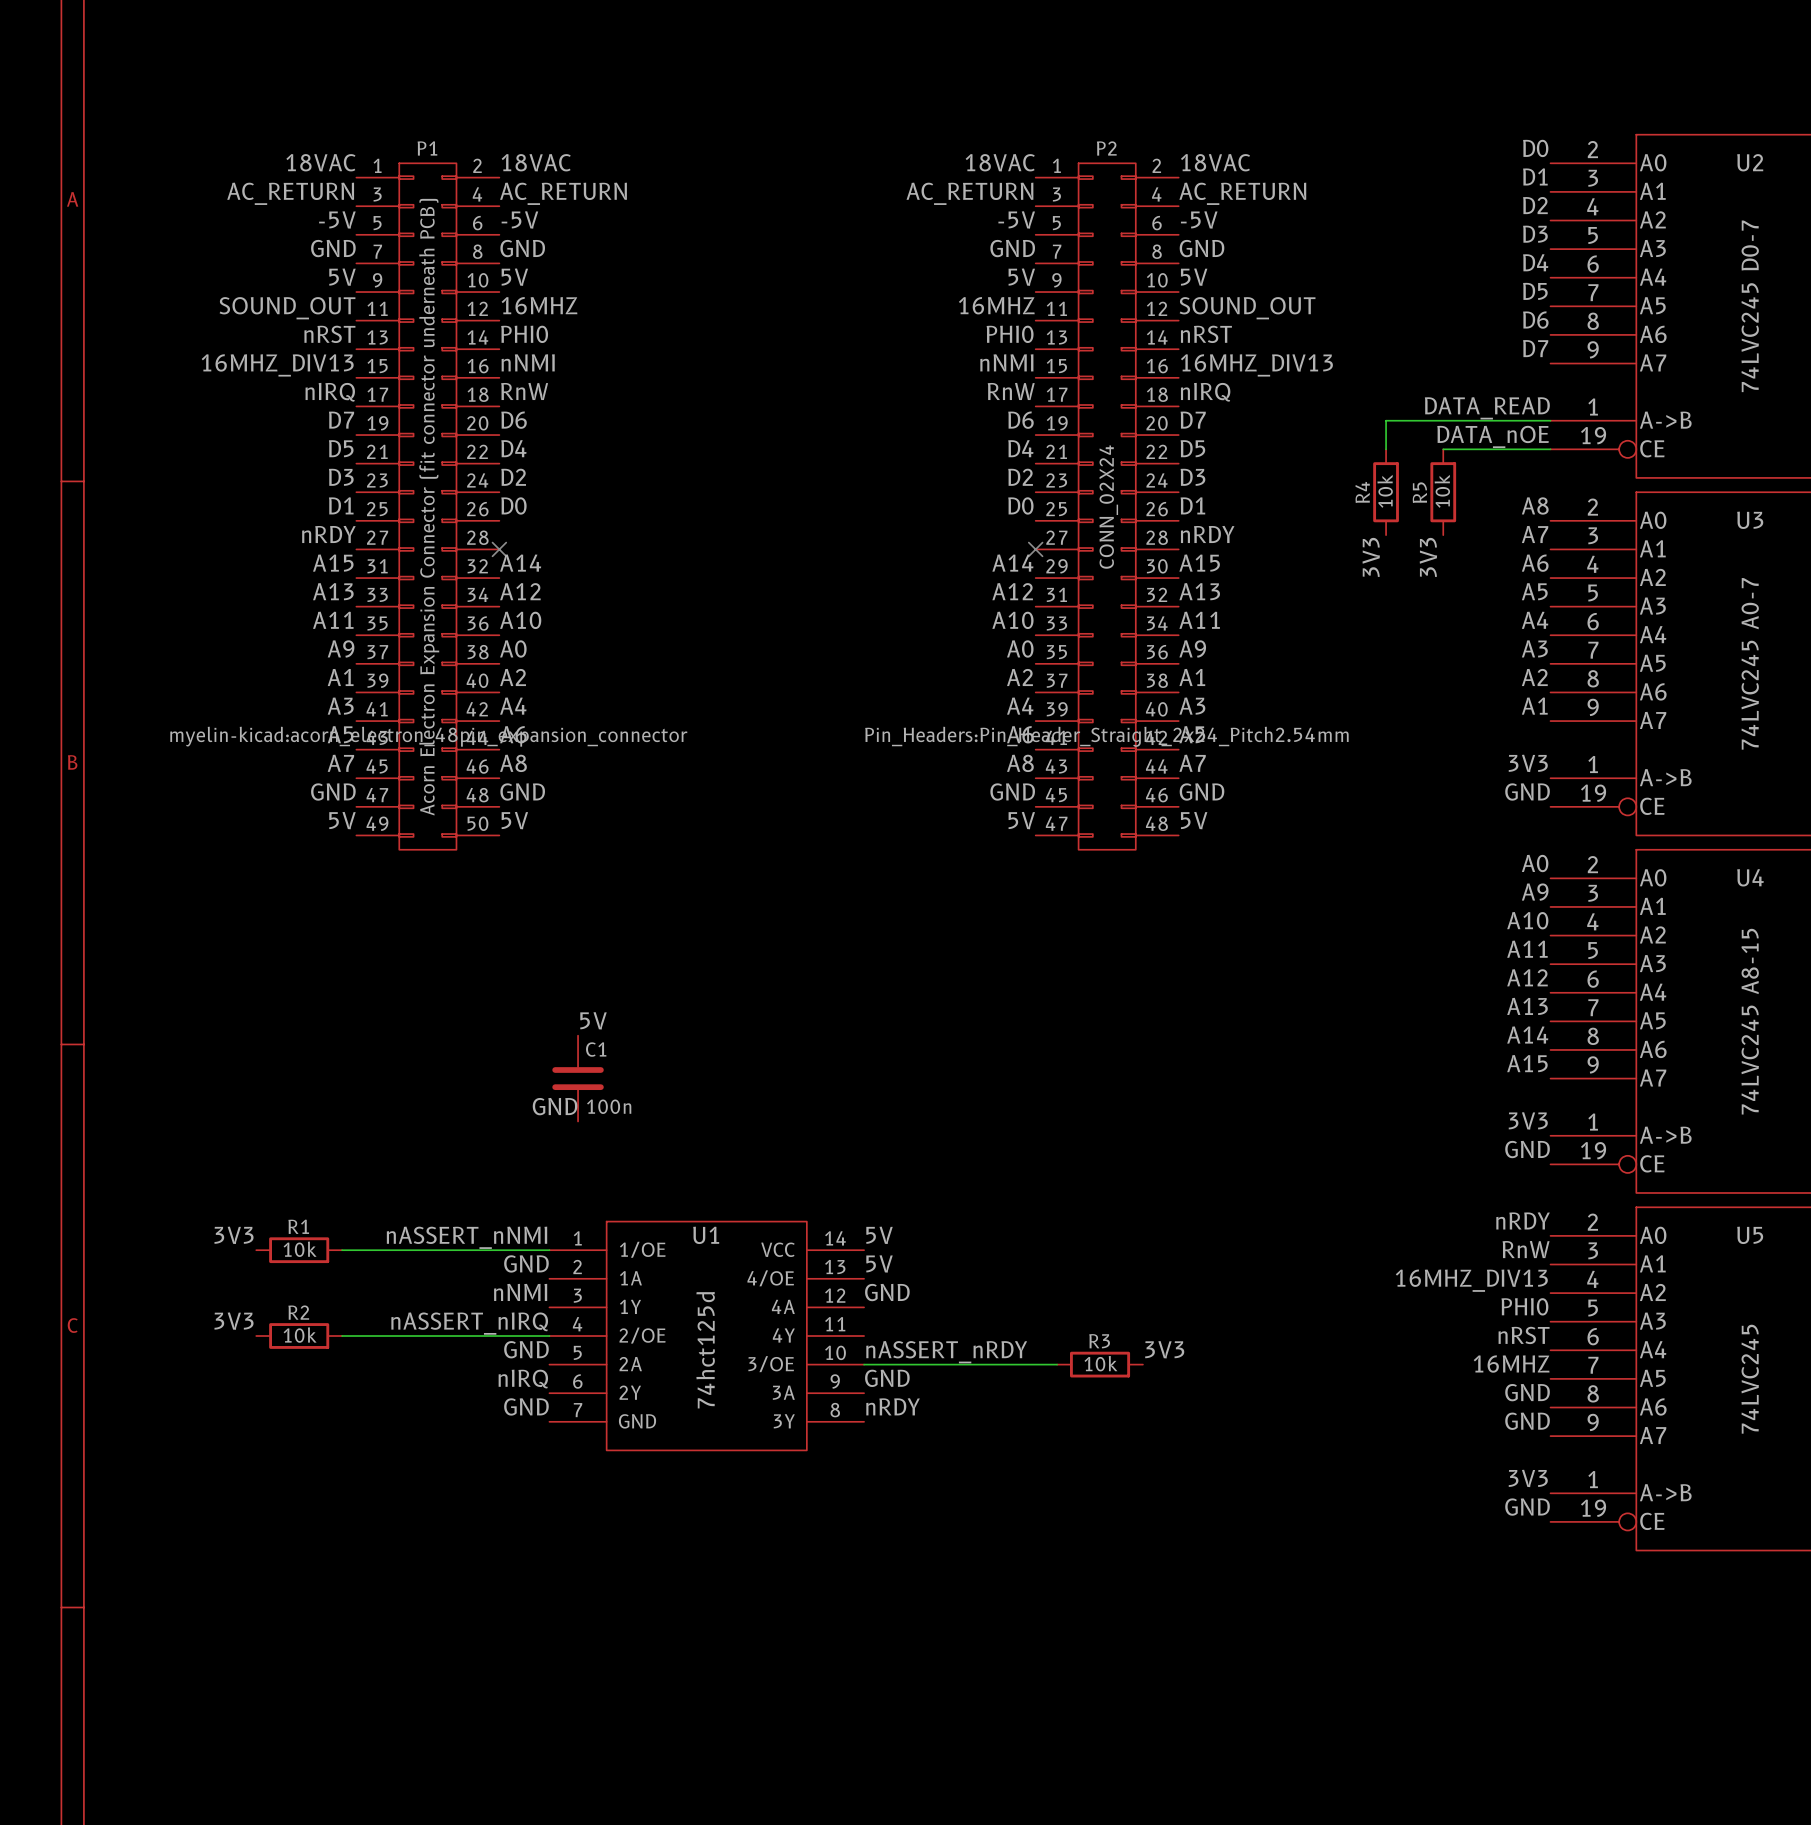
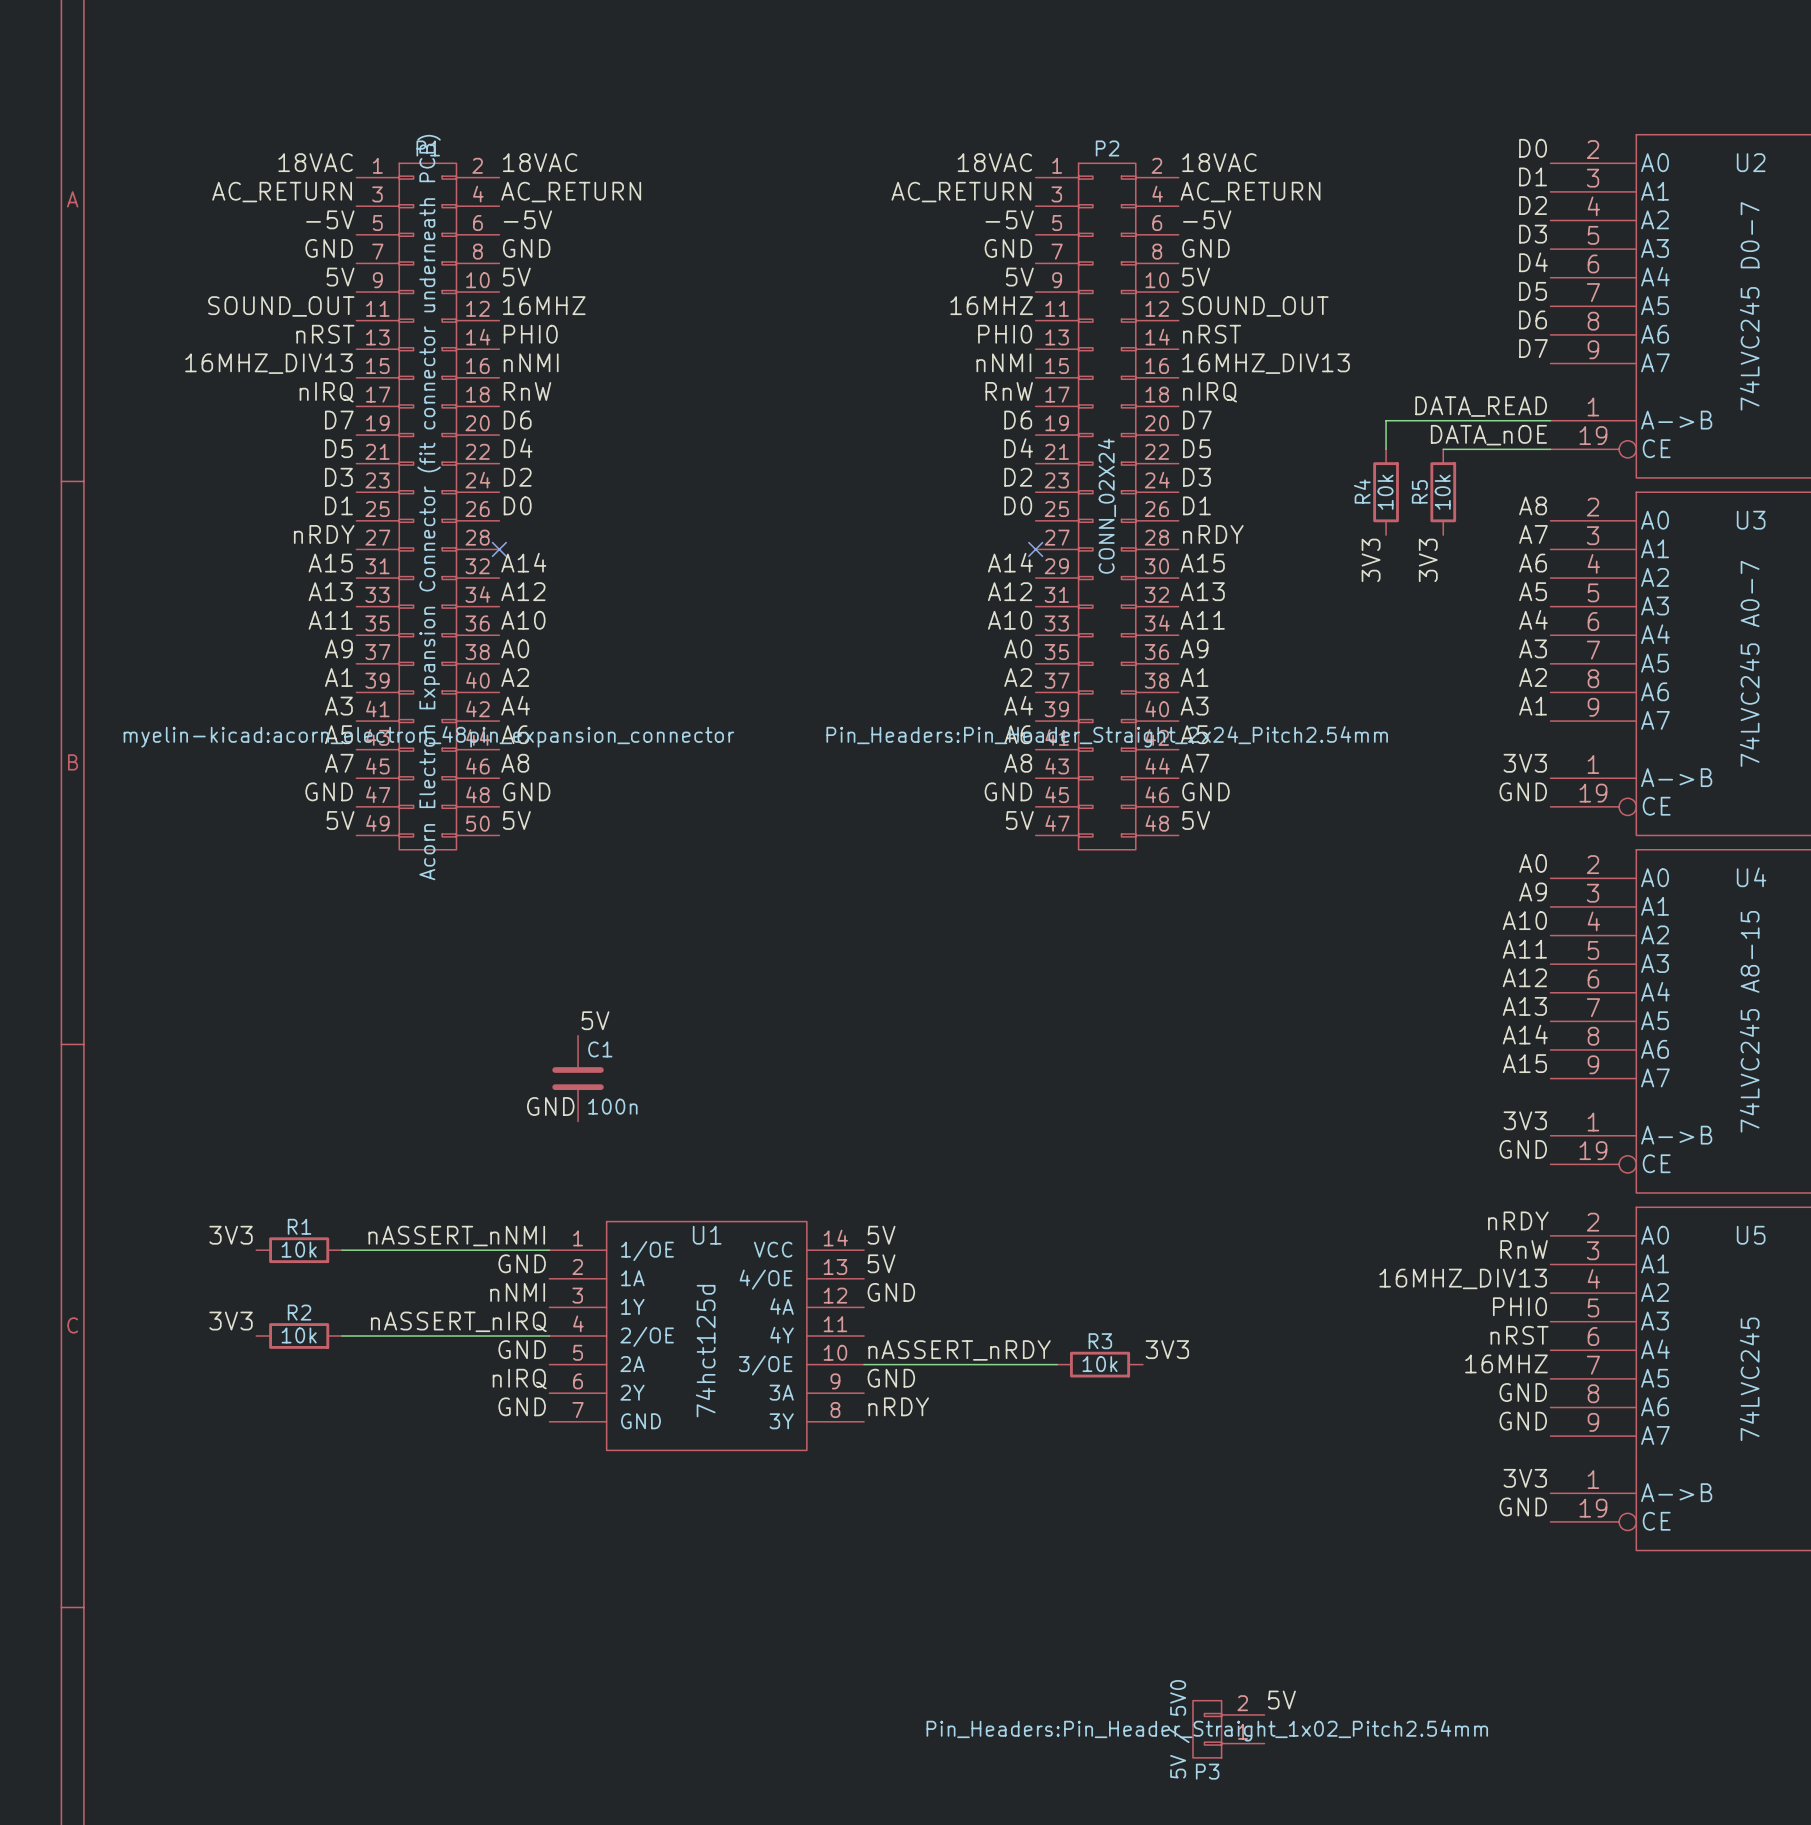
label: none -> 5V (1281, 1700)
P3: none -> 5V / 5V0 (1228, 1729)

